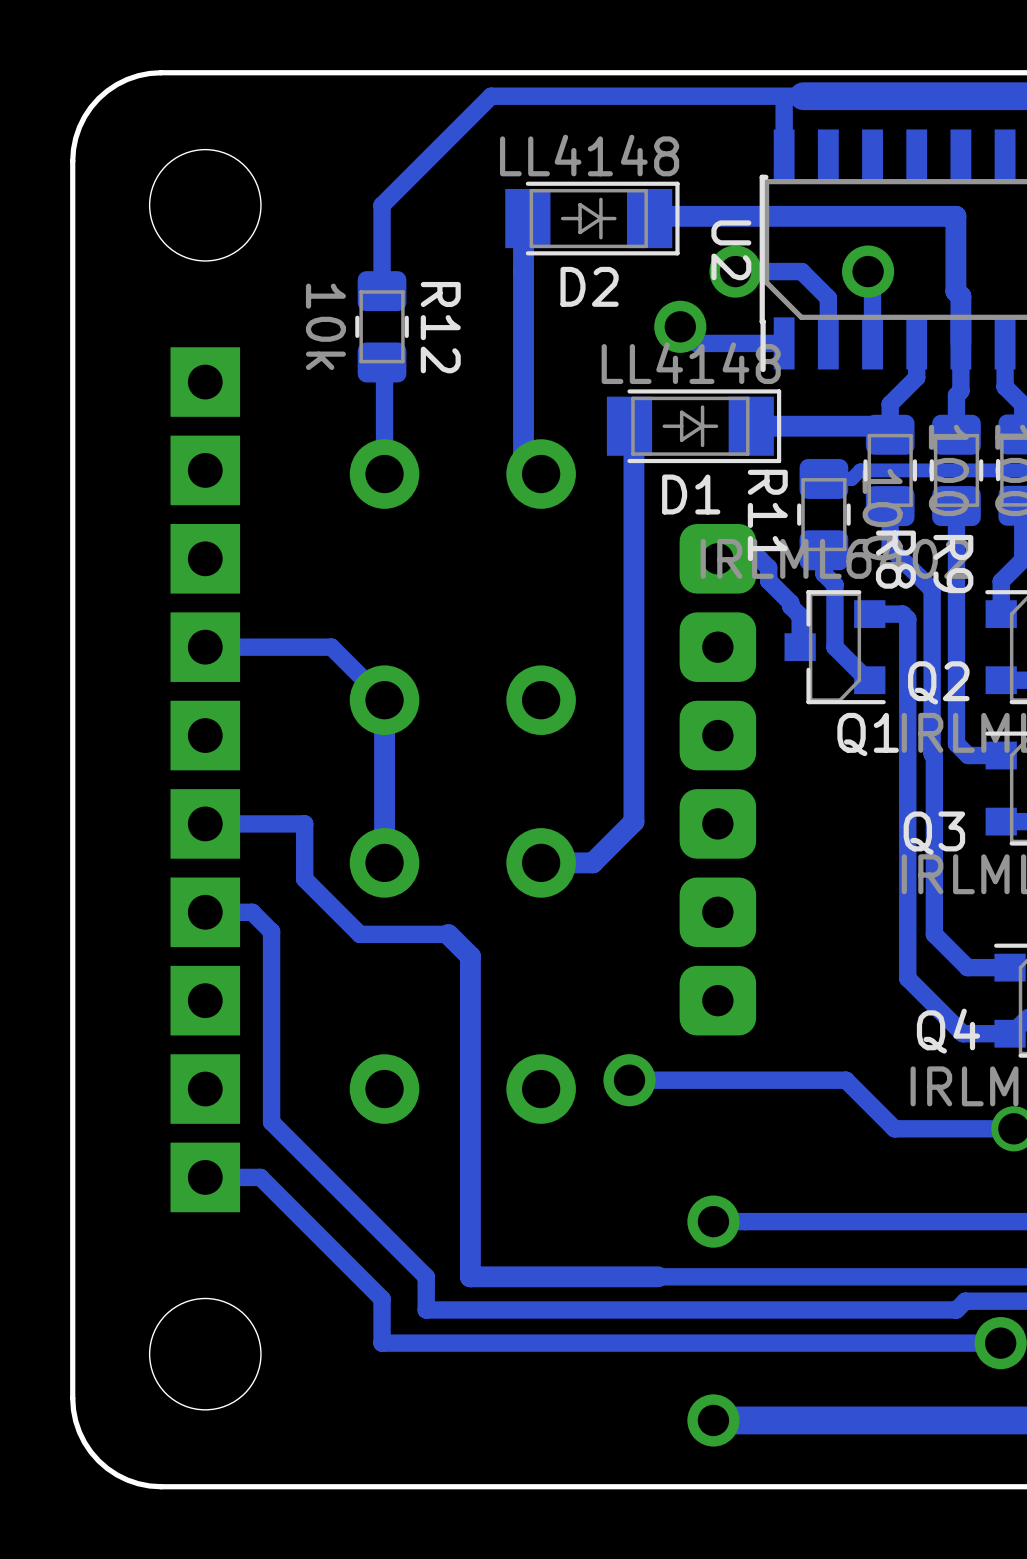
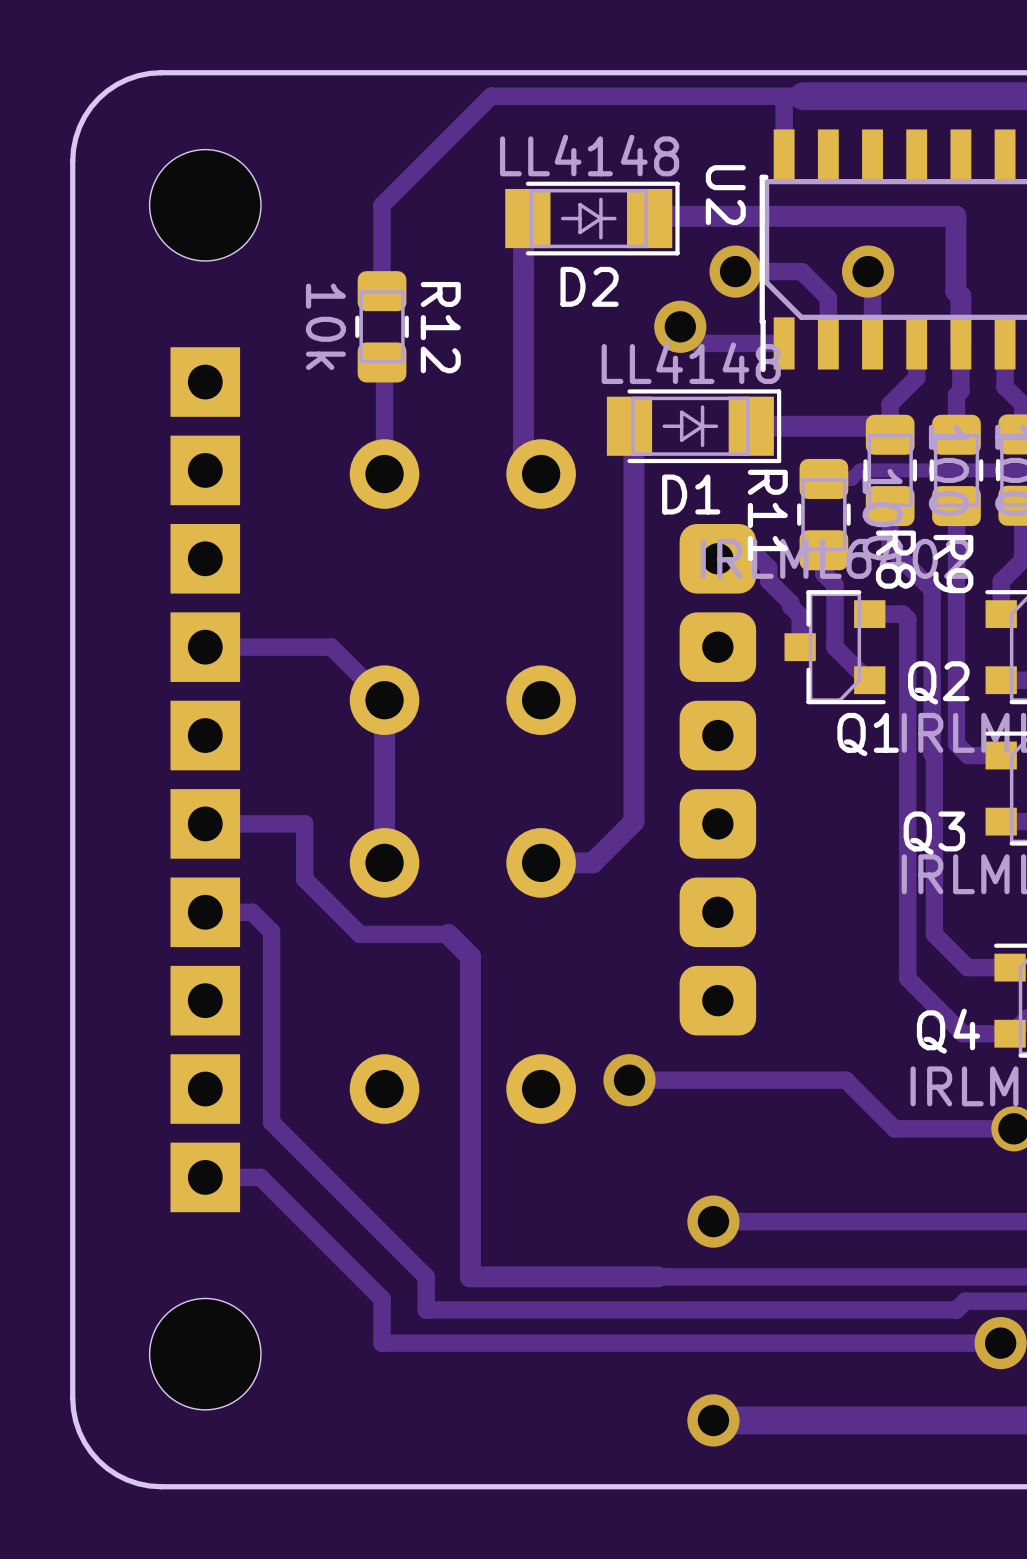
U2 name position: U2 (731, 250) -> U2 (725, 195)

